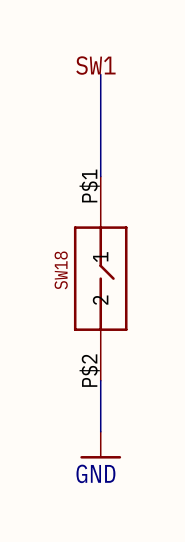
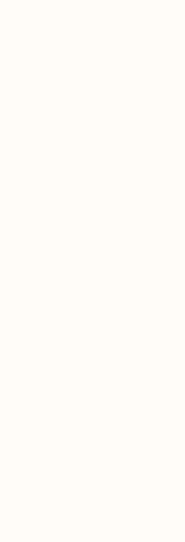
label: SW1 (95, 65) -> none
wire: (100, 74) (100, 176) -> none
SW18: (100, 278) -> none
wire: (100, 380) (100, 431) -> none
power symbol: GND (100, 445) -> none

